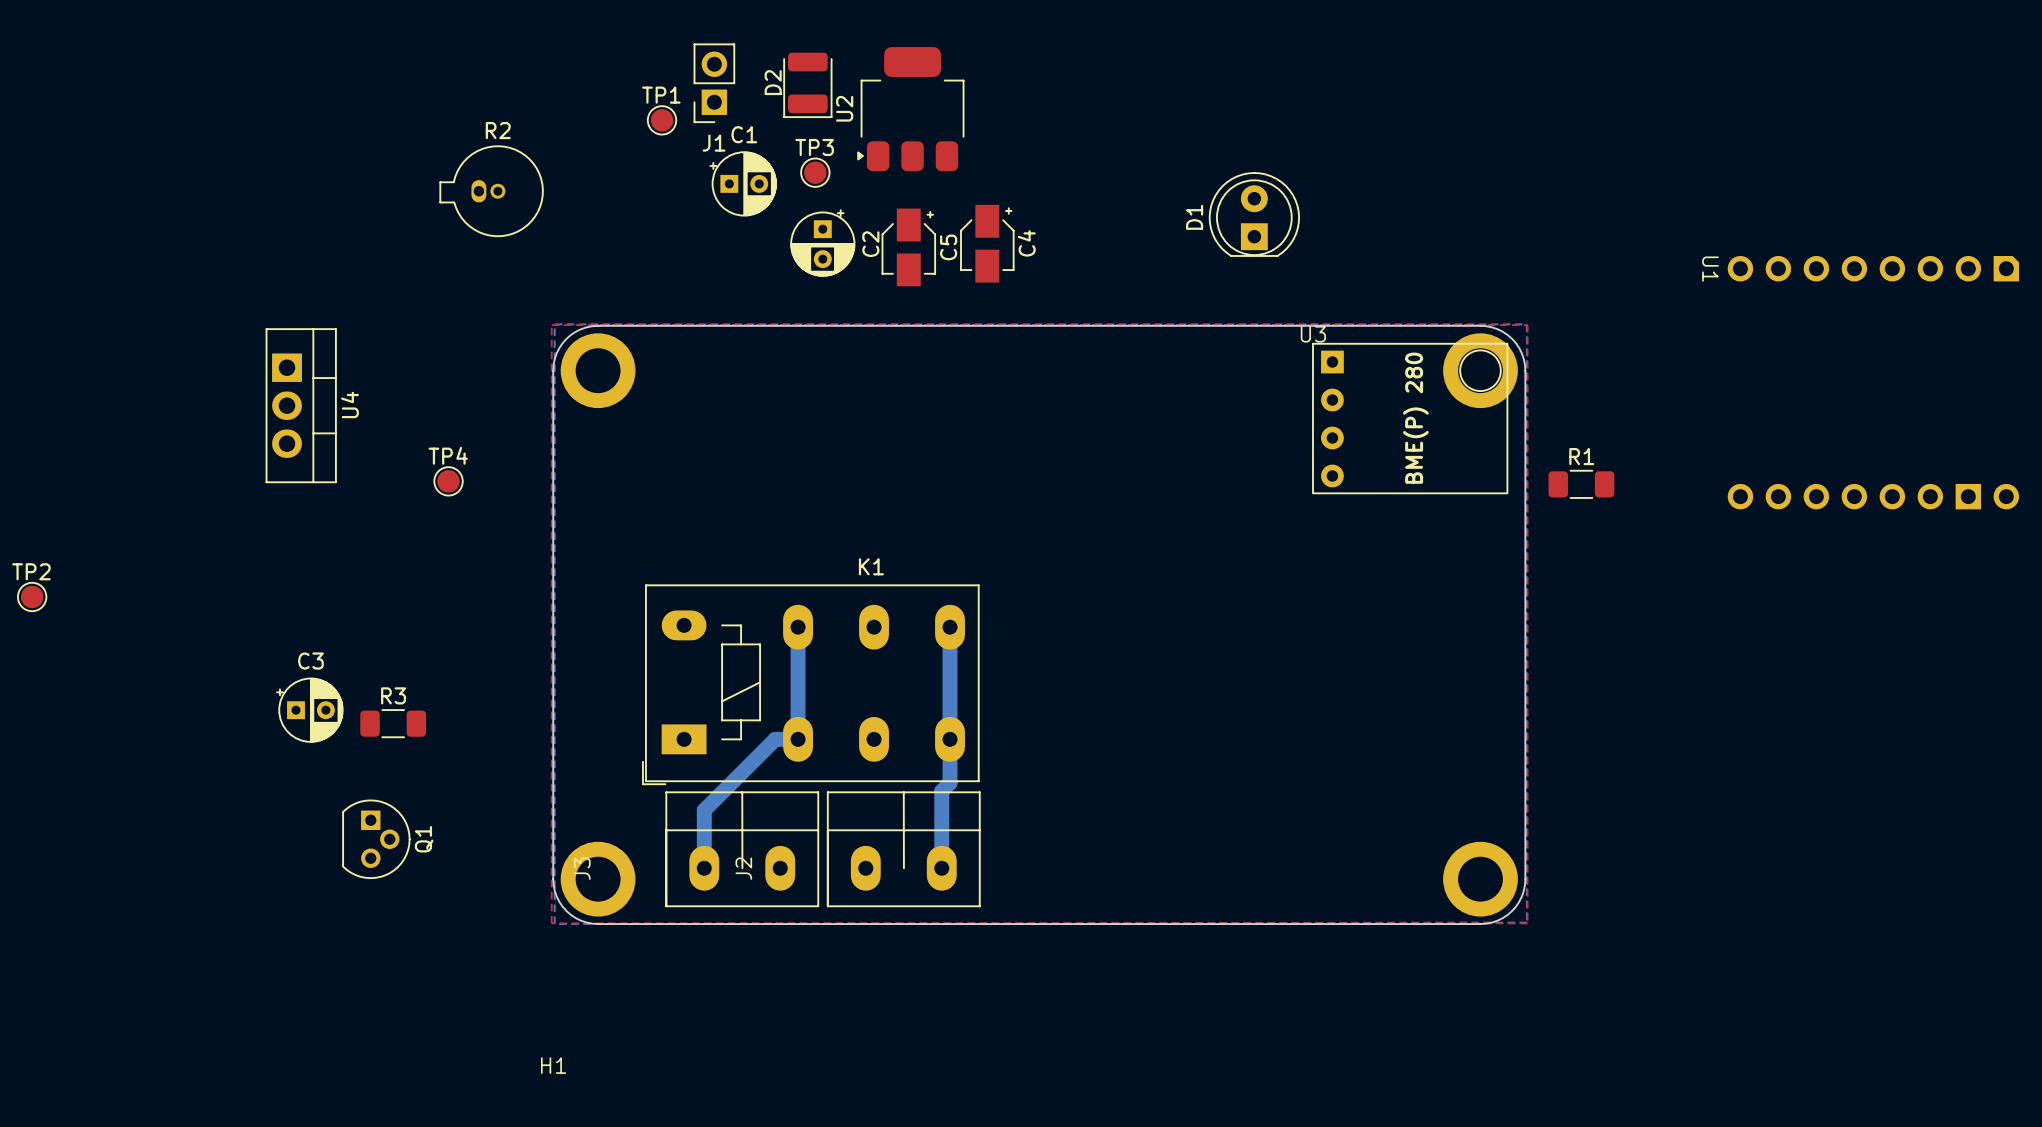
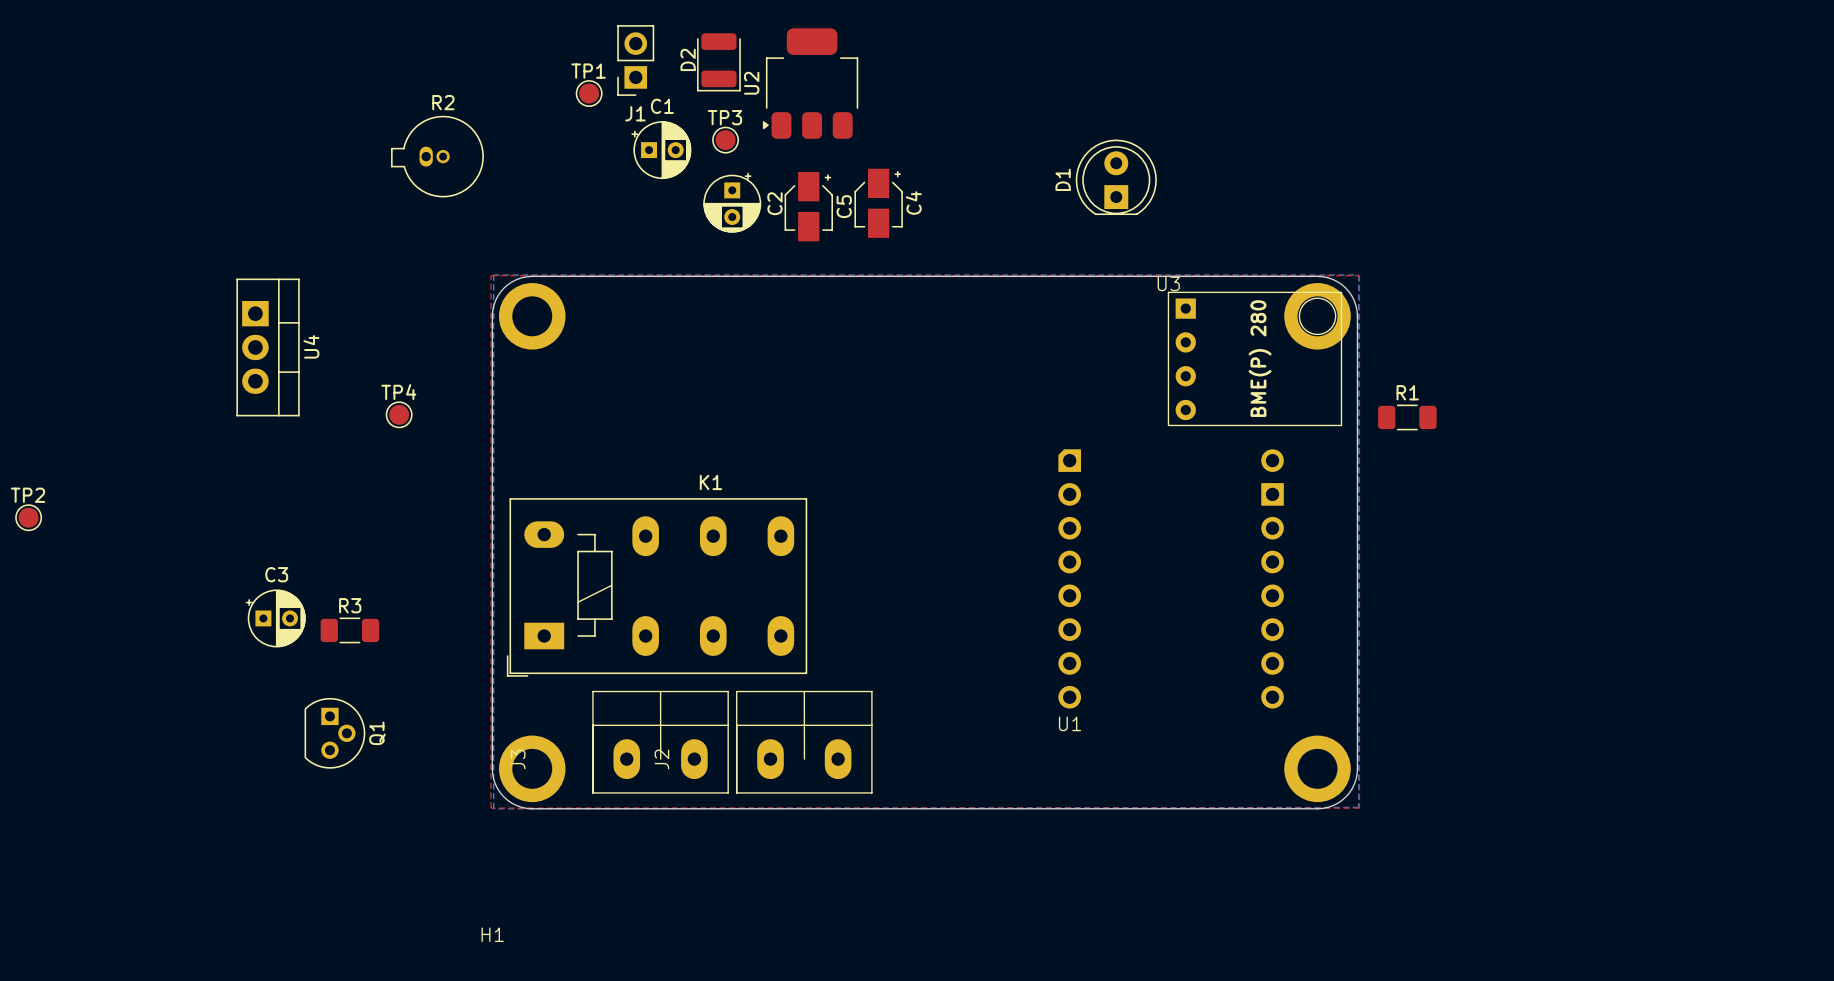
U1 rotation: 0° (1873, 382) -> 90° counterclockwise (1171, 578)
U1 position: (1873, 382) -> (1171, 578)
bottom track: (798, 627) (798, 739) (775, 739) (704, 810) (704, 868) -> none
bottom track: (950, 627) (950, 783) (941, 791) (941, 868) -> none
K1 position: (810, 684) -> (657, 587)

